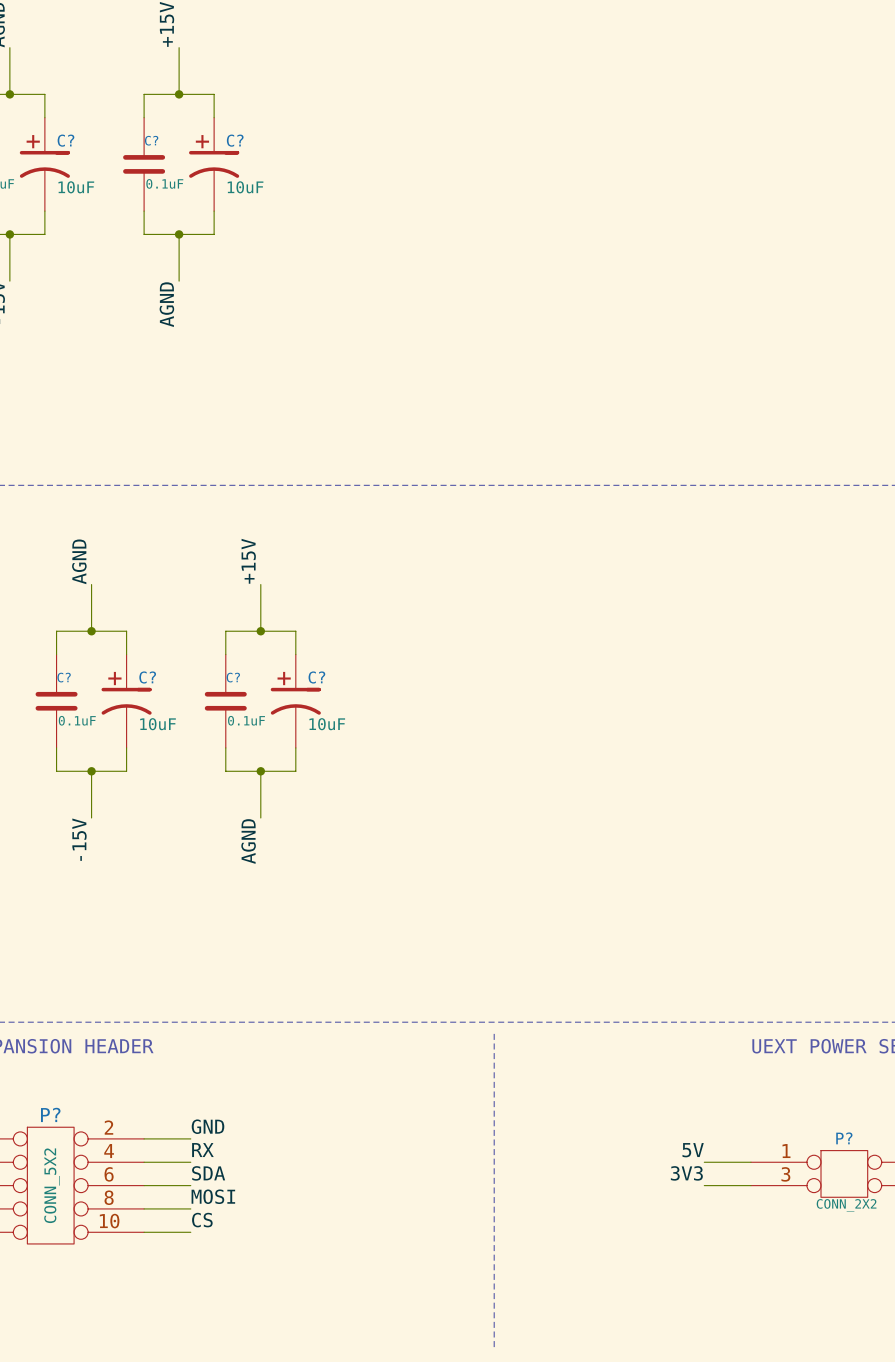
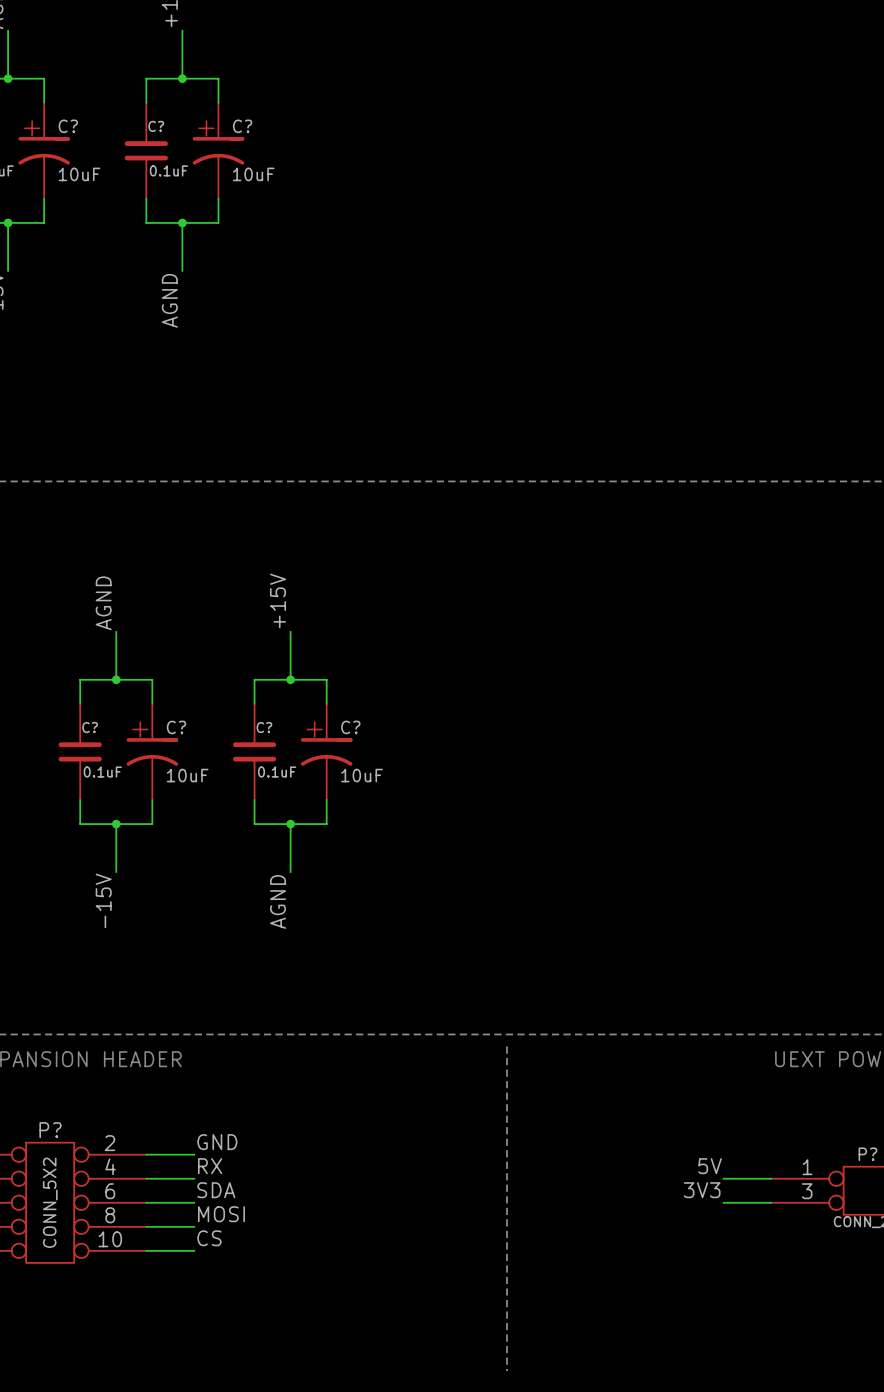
label position: AGND (79, 561) -> AGND (103, 603)
label position: +15V (248, 561) -> +15V (278, 600)
wire: (91, 584) (91, 631) -> (116, 631) (116, 679)
wire: (260, 584) (260, 631) -> (290, 631) (290, 679)
junction: (91, 631) -> none
junction: (260, 631) -> none
wire: (56, 654) (56, 631) (126, 631) (126, 654) -> (80, 703) (80, 679) (152, 679) (152, 703)
wire: (225, 654) (225, 631) (295, 631) (295, 654) -> (254, 703) (254, 679) (326, 679) (326, 703)
junction: none -> (116, 679)
junction: none -> (290, 679)
C? position: (56, 701) -> (80, 751)
C? position: (126, 701) -> (152, 751)
C? position: (225, 701) -> (254, 751)
C? position: (295, 701) -> (326, 751)
wire: (56, 747) (56, 771) (126, 771) (126, 747) -> (80, 800) (80, 824) (152, 824) (152, 800)
wire: (225, 747) (225, 771) (295, 771) (295, 747) -> (254, 800) (254, 824) (326, 824) (326, 800)
wire: (91, 771) (91, 817) -> (116, 824) (116, 872)
junction: (91, 771) -> none
wire: (260, 771) (260, 817) -> (290, 824) (290, 872)
junction: (260, 771) -> none
junction: none -> (116, 824)
junction: none -> (290, 824)
label position: -15V (79, 839) -> -15V (103, 900)
label position: AGND (248, 841) -> AGND (278, 901)

